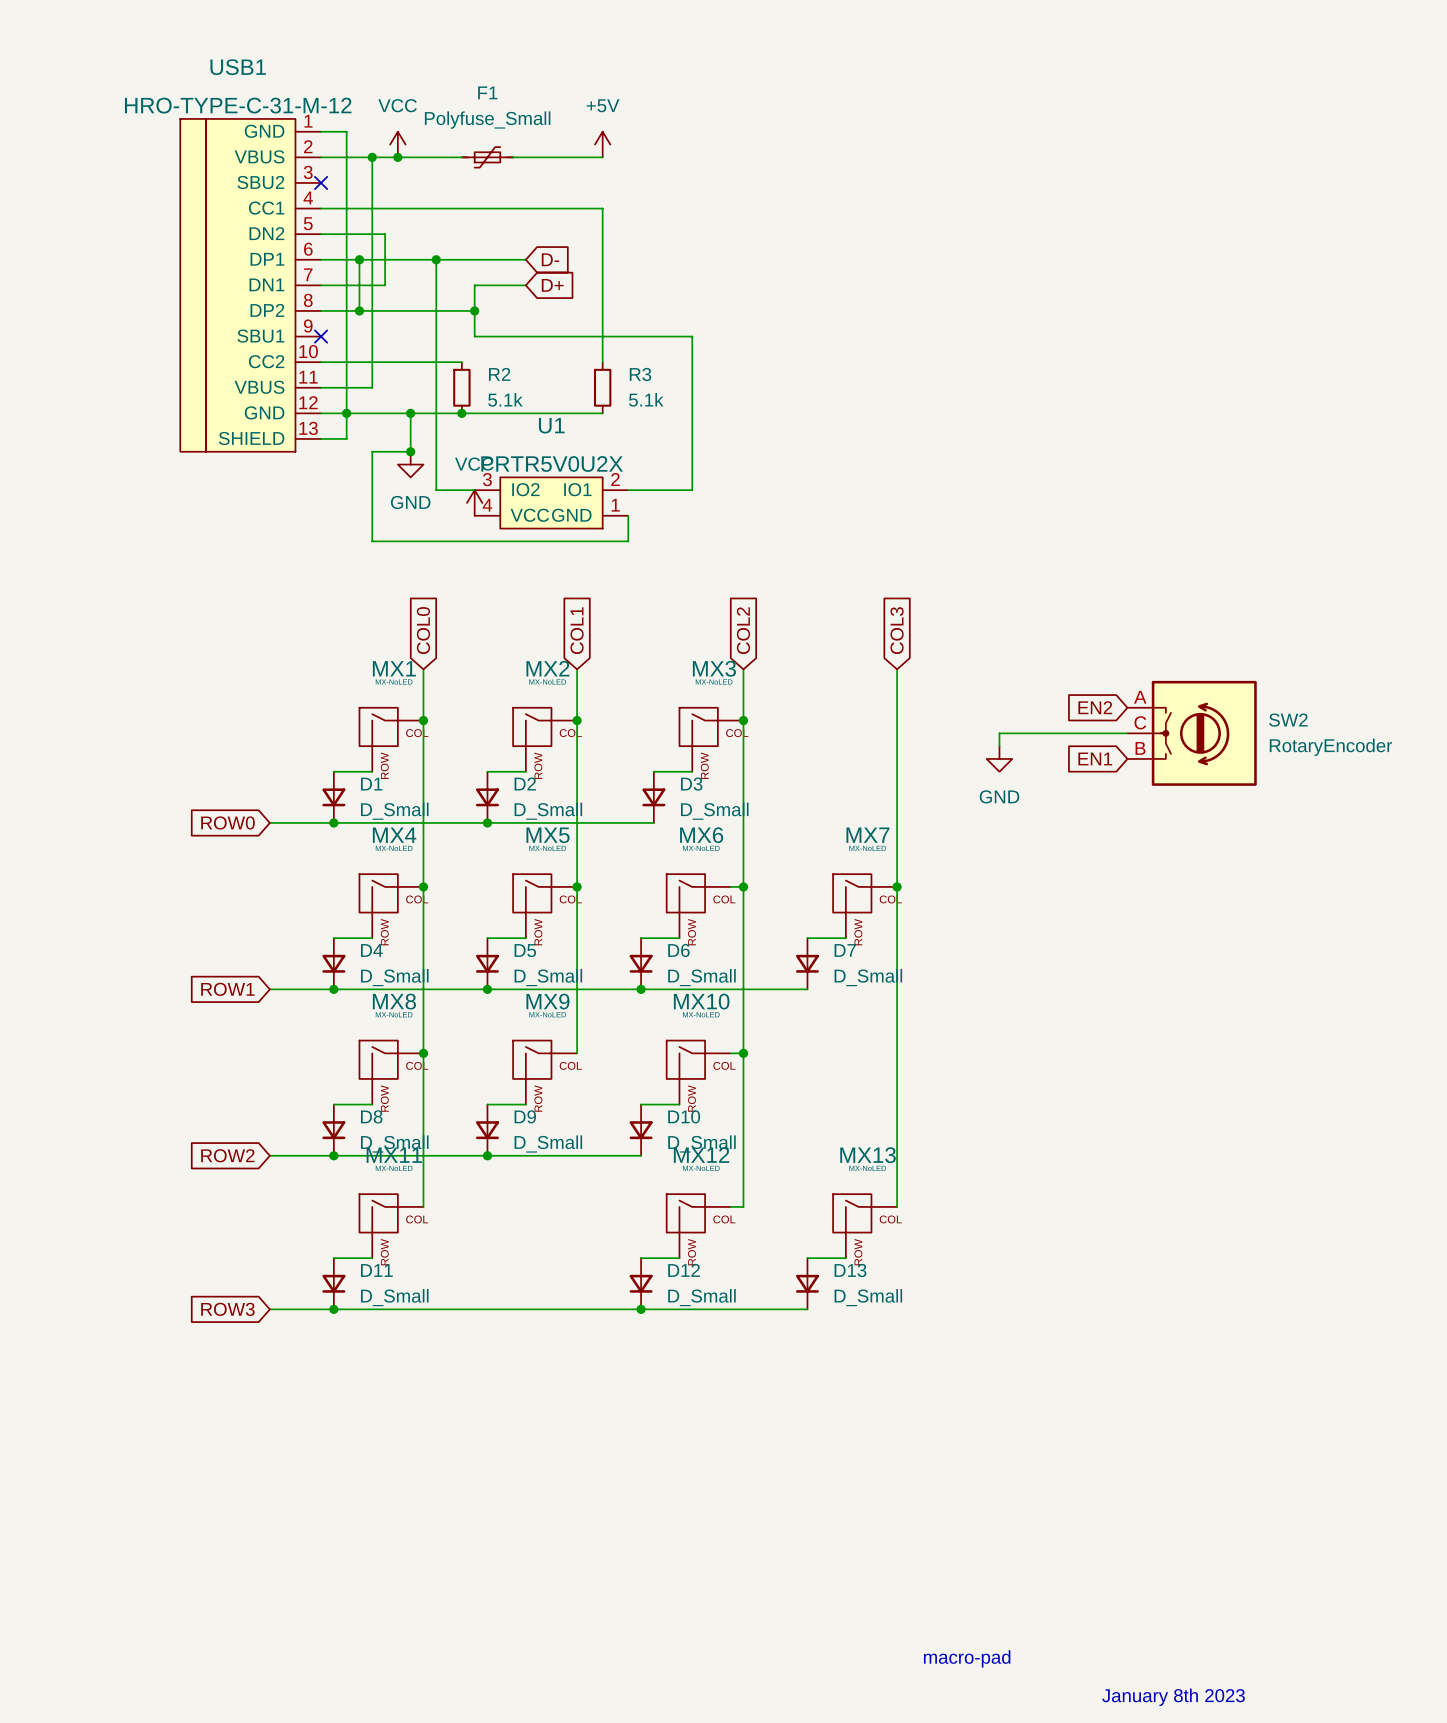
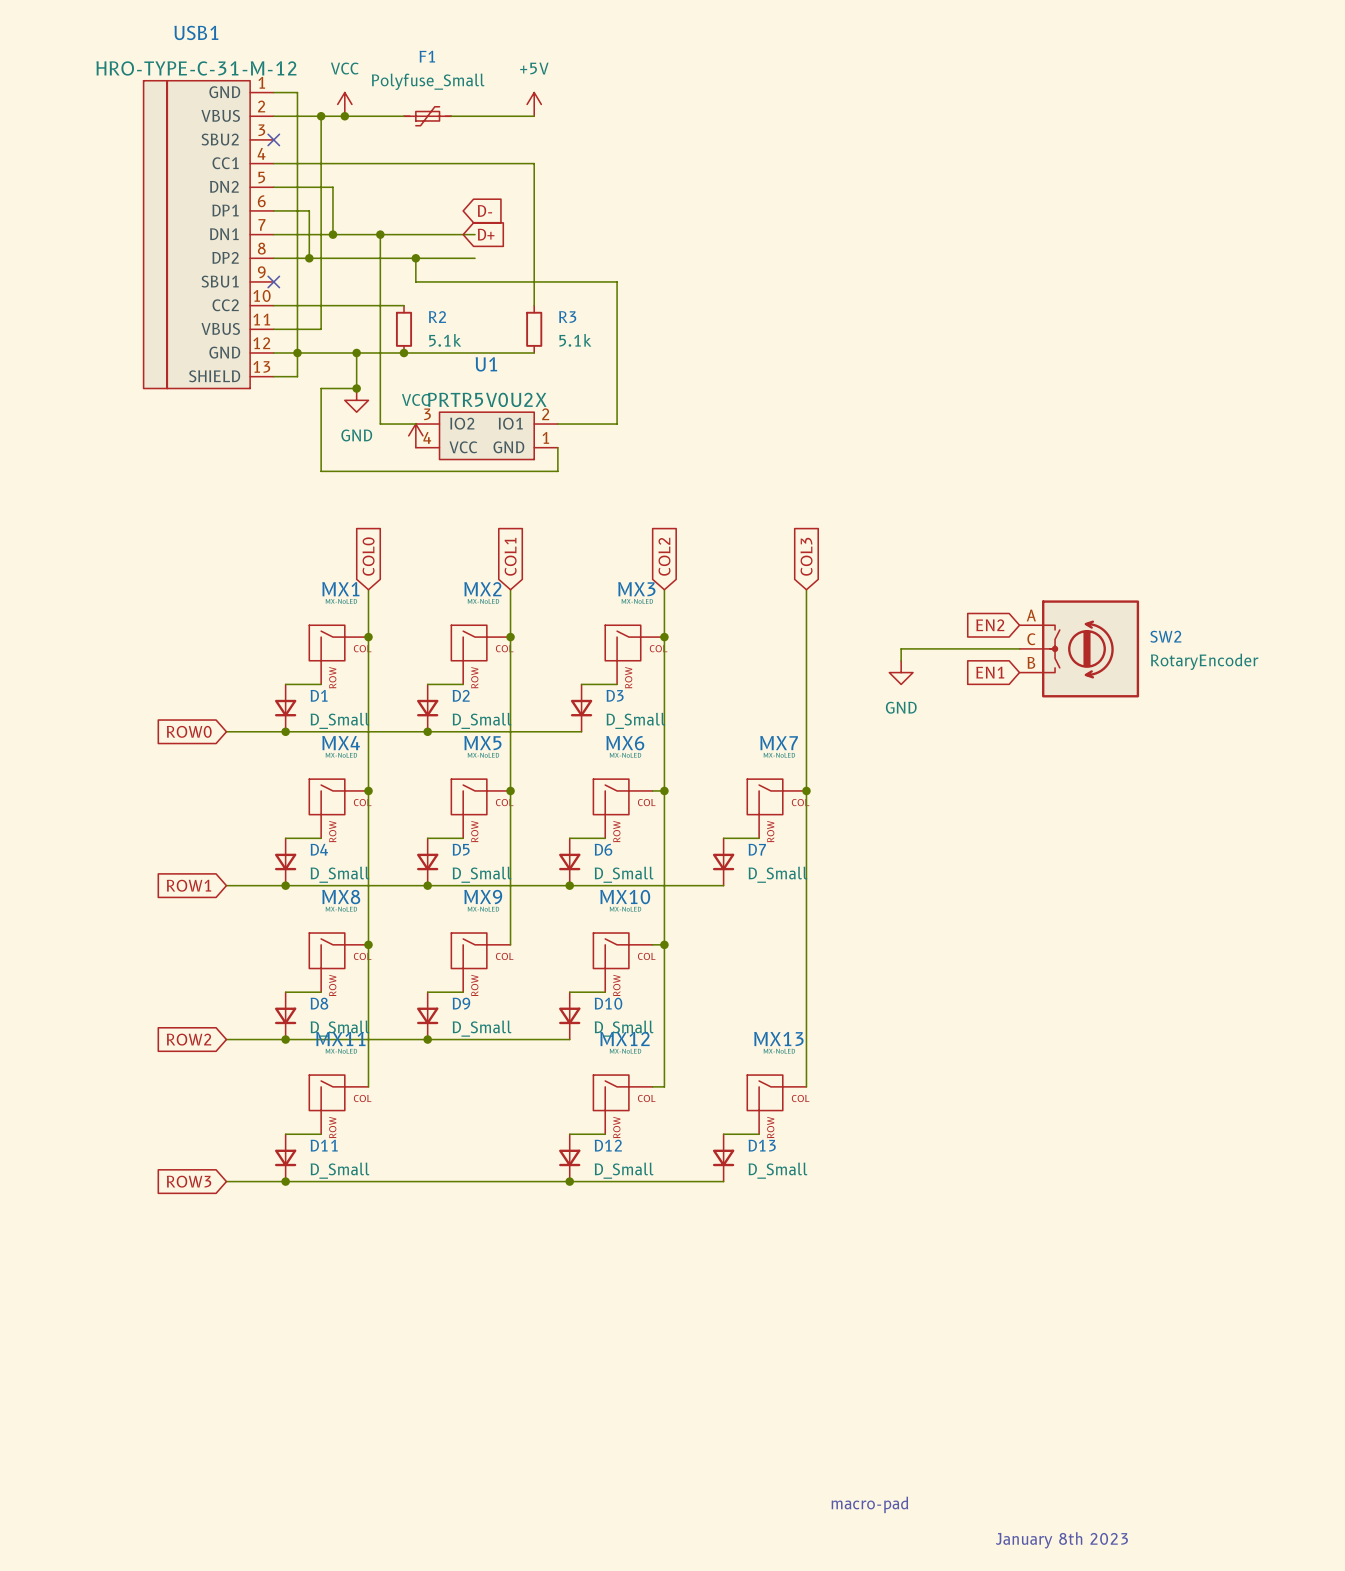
wire: (359, 259) (525, 259) -> none
junction: (359, 259) -> none
wire: (436, 259) (436, 285) -> none
junction position: (436, 259) -> (380, 234)
wire: none -> (332, 234) (415, 234)
junction: none -> (332, 234)
wire: (474, 285) (474, 310) -> (475, 258) (415, 258)
wire: none -> (463, 234) (475, 234)

